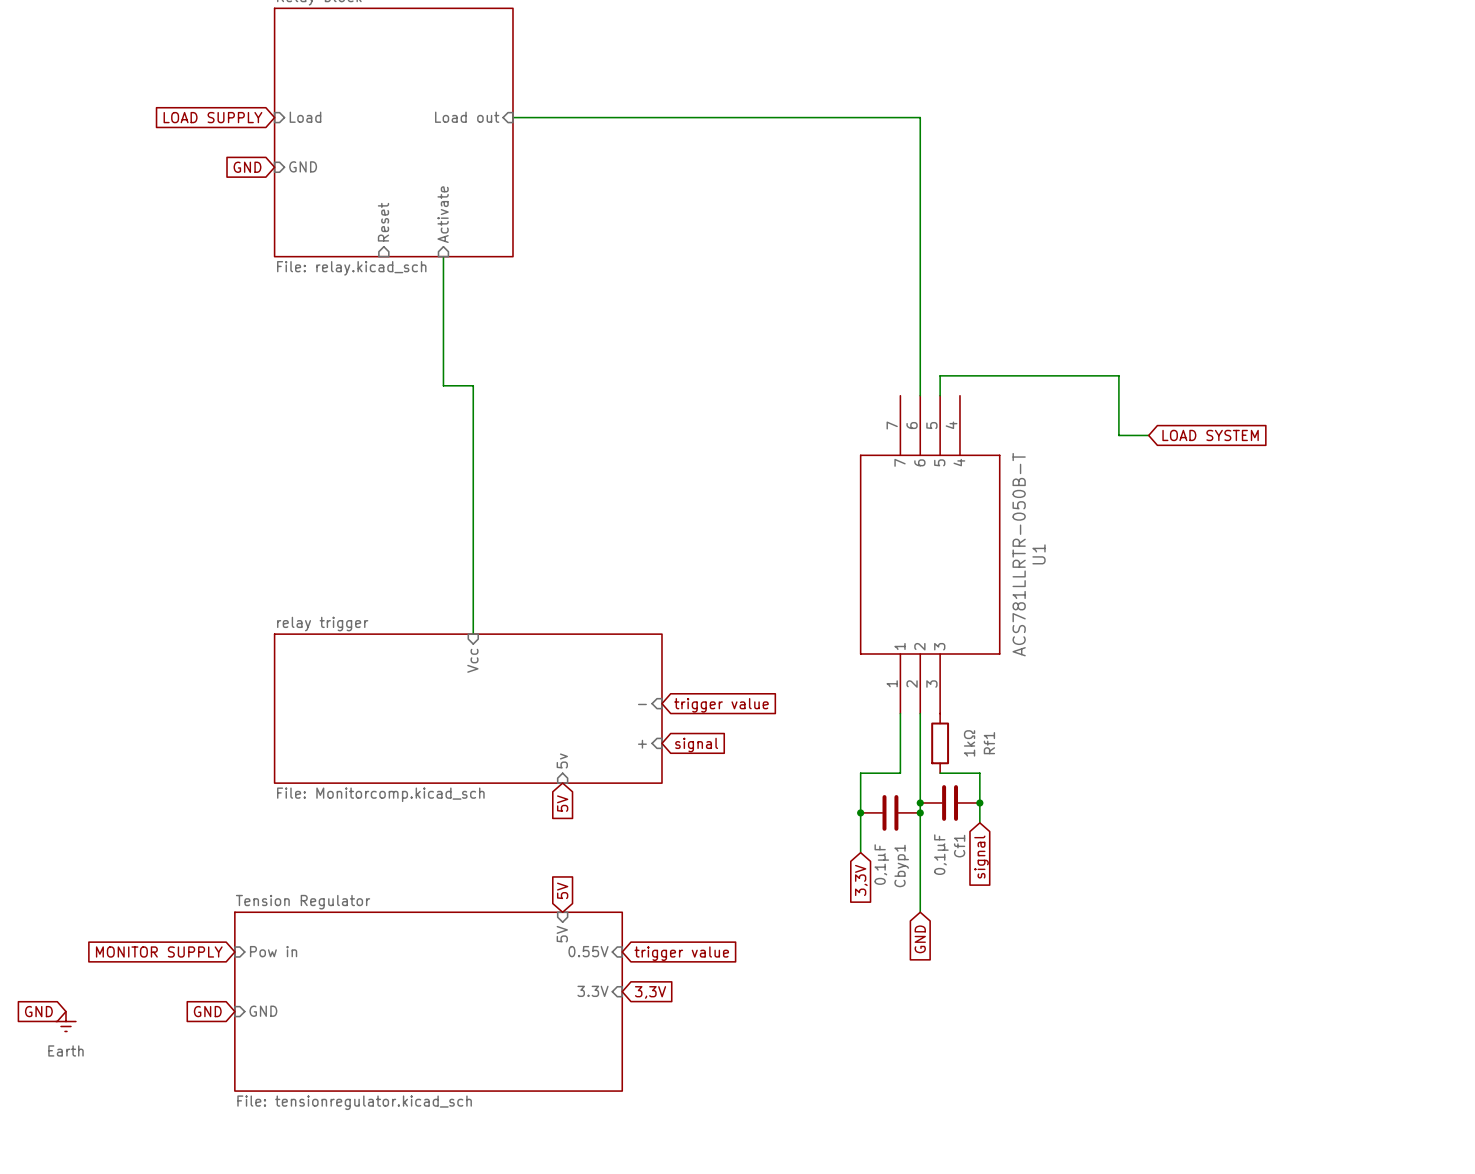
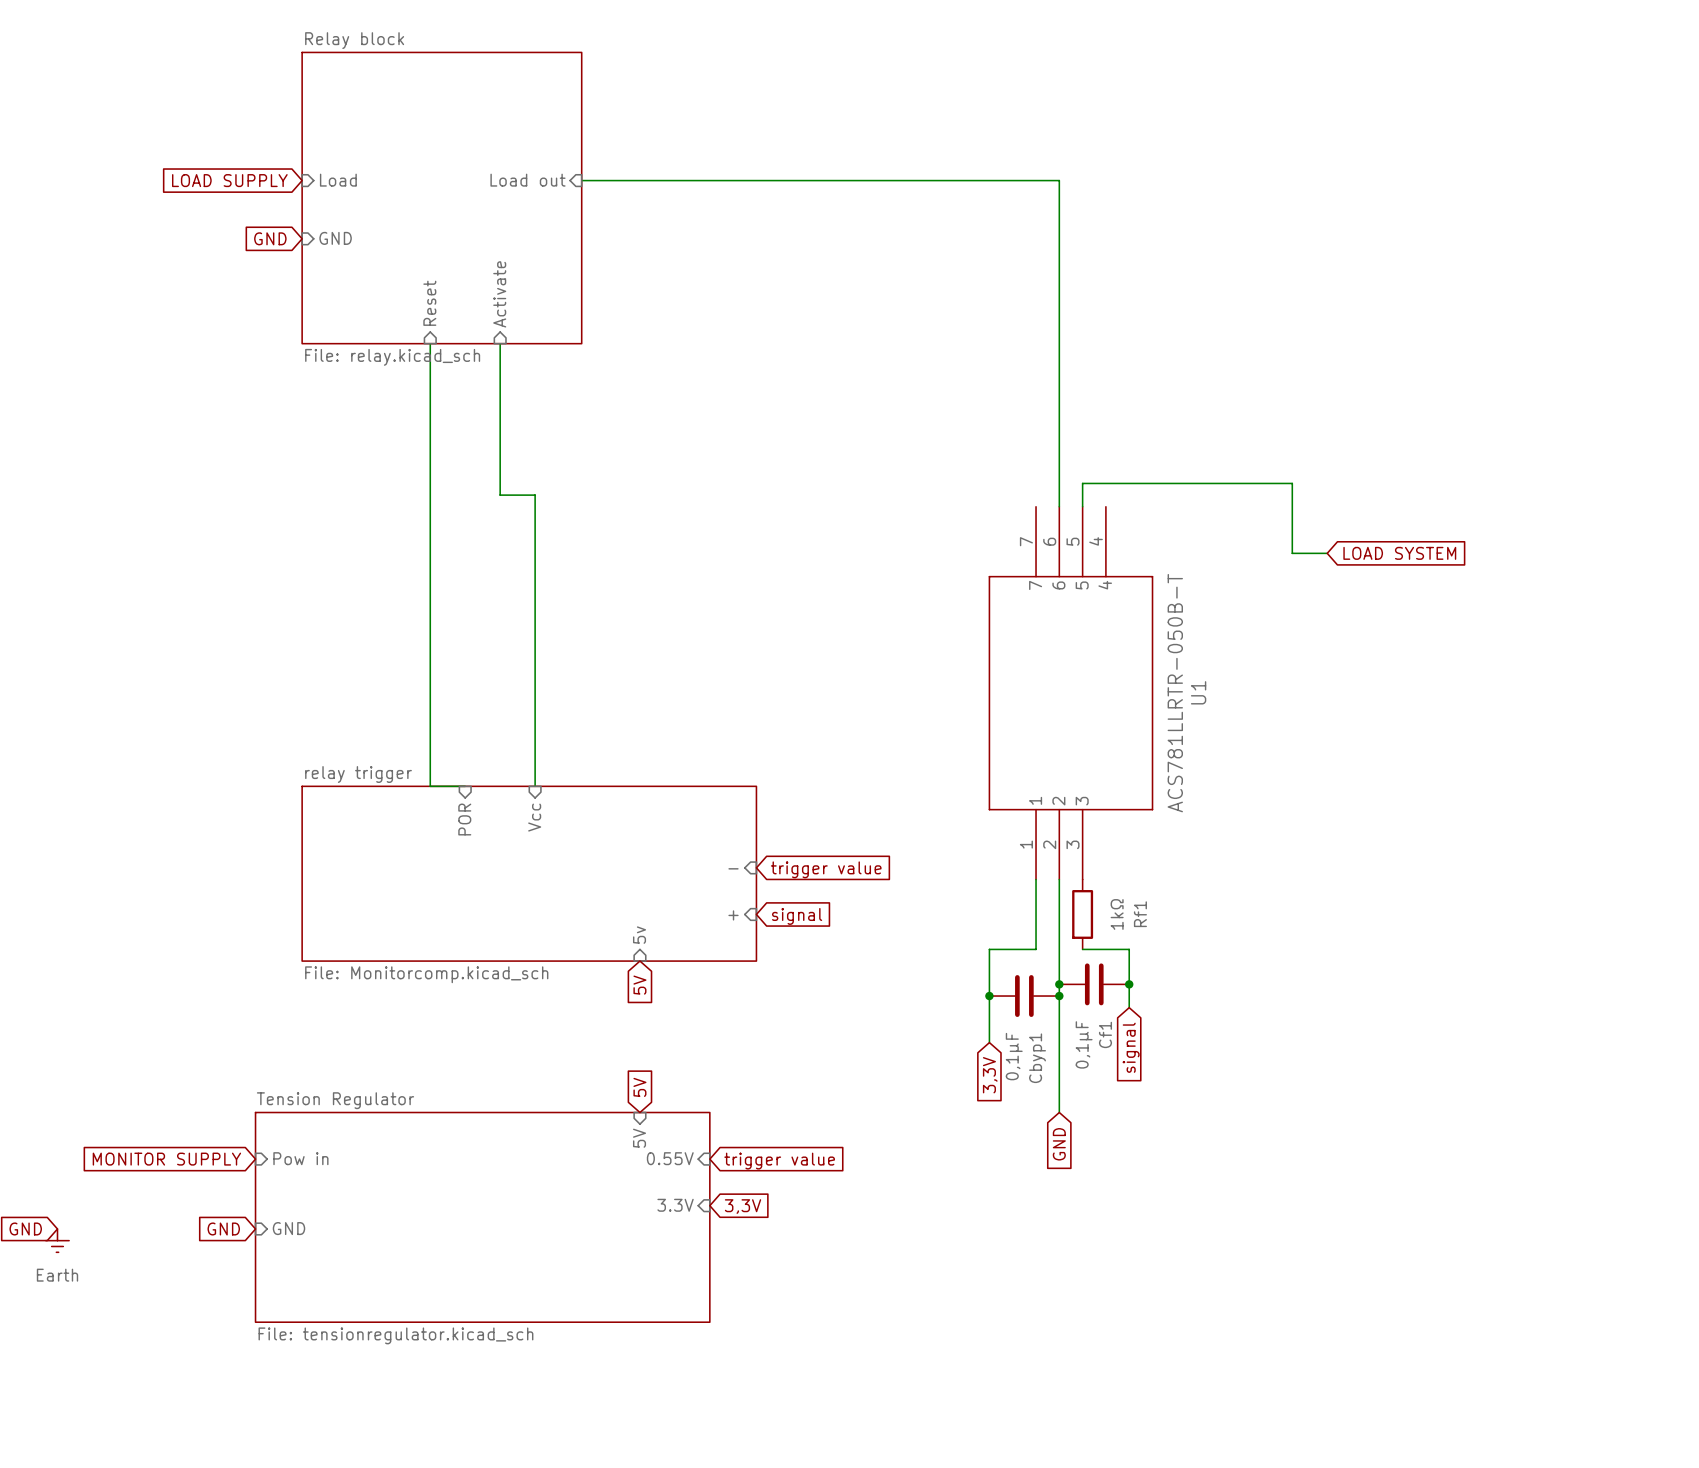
wire: none -> (430, 343) (430, 786) (465, 786)
sheet pin: none -> POR (464, 819)

